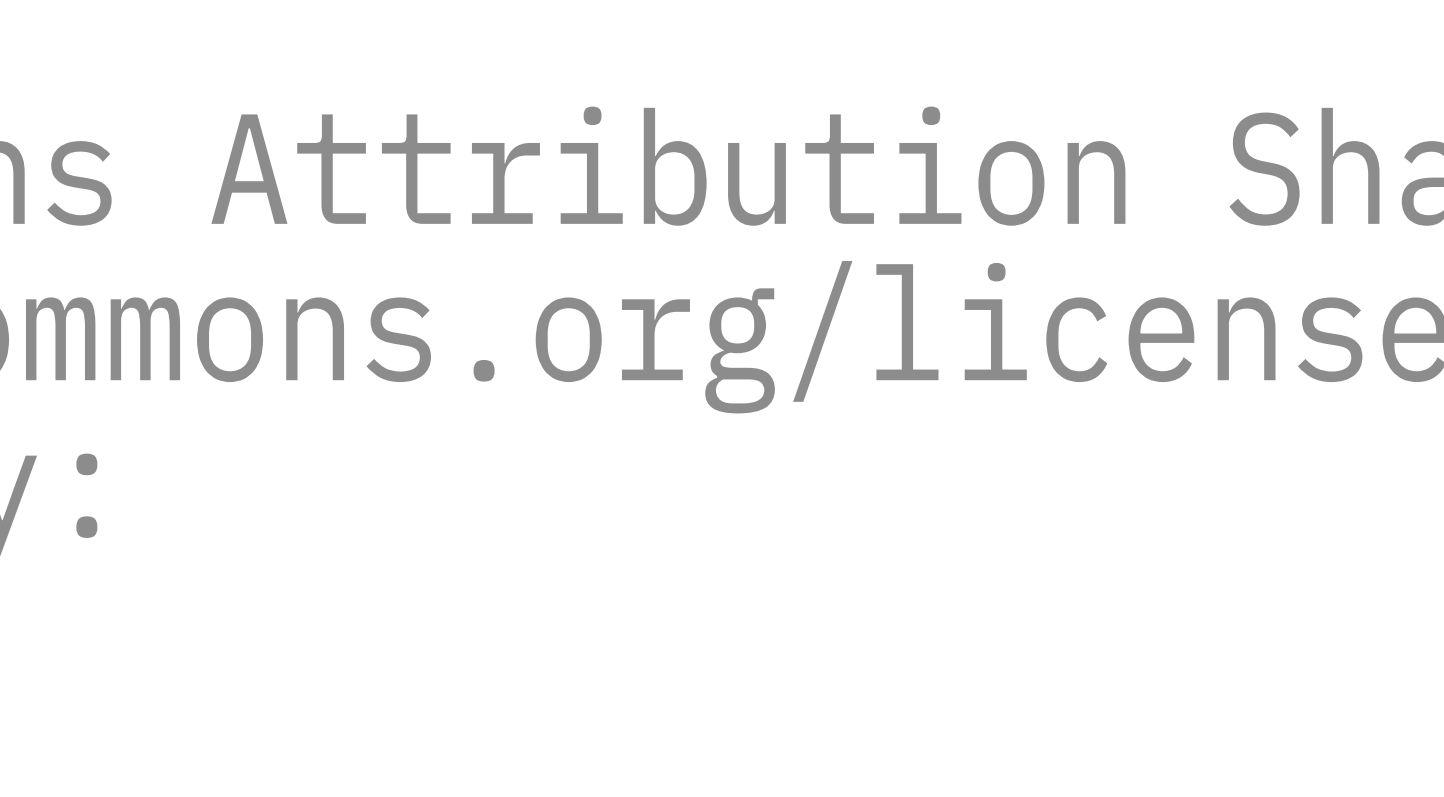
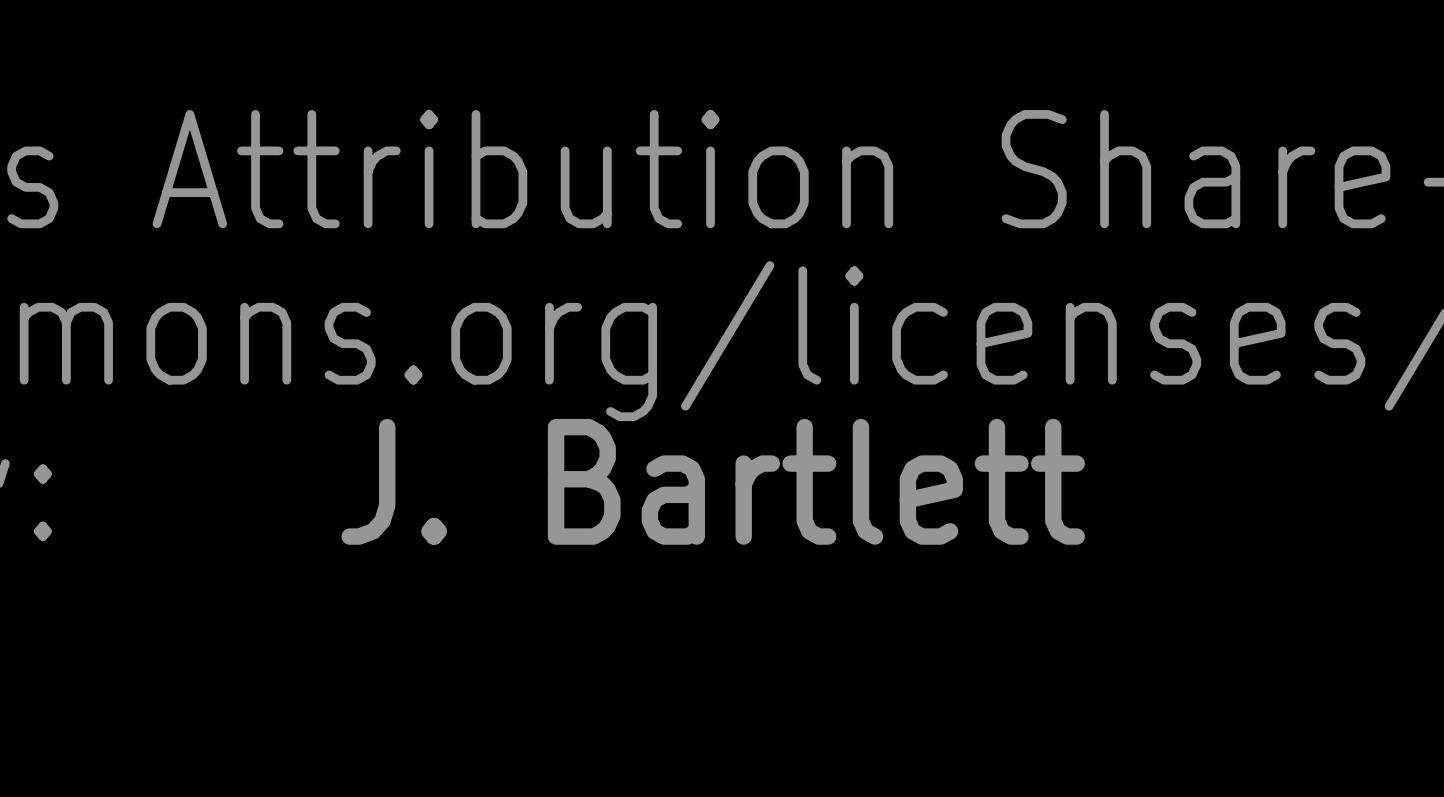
text: none -> J. Bartlett (713, 481)

